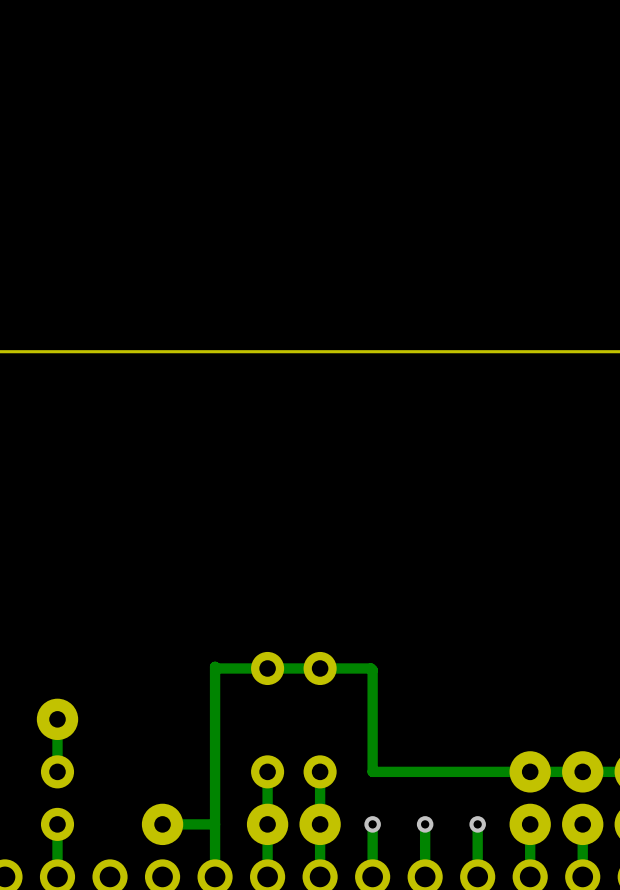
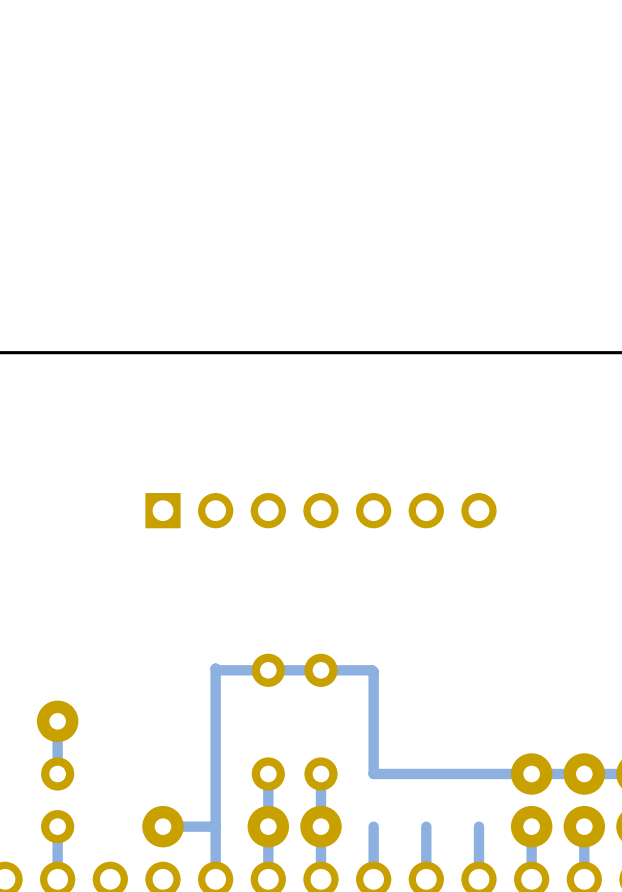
part: none -> (320, 510)
via: (372, 824) -> none
via: (425, 824) -> none
via: (477, 824) -> none

